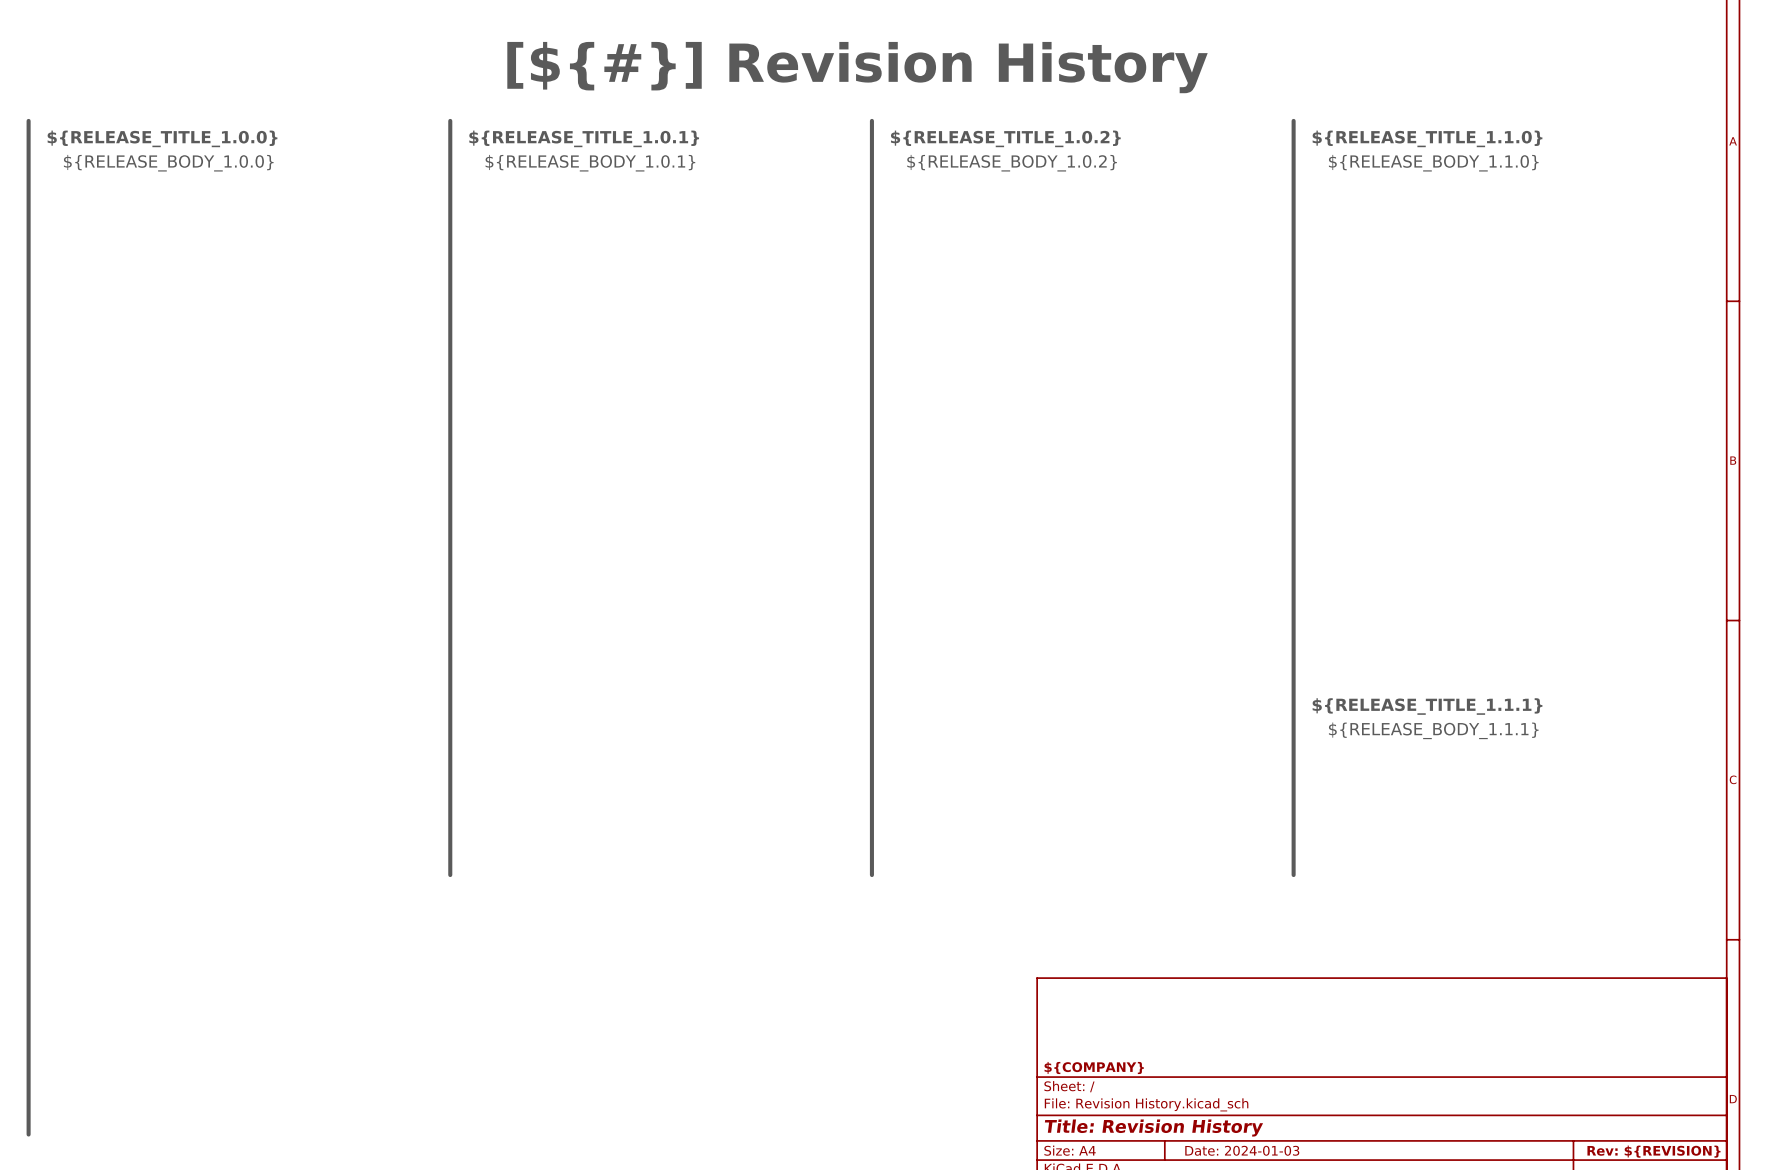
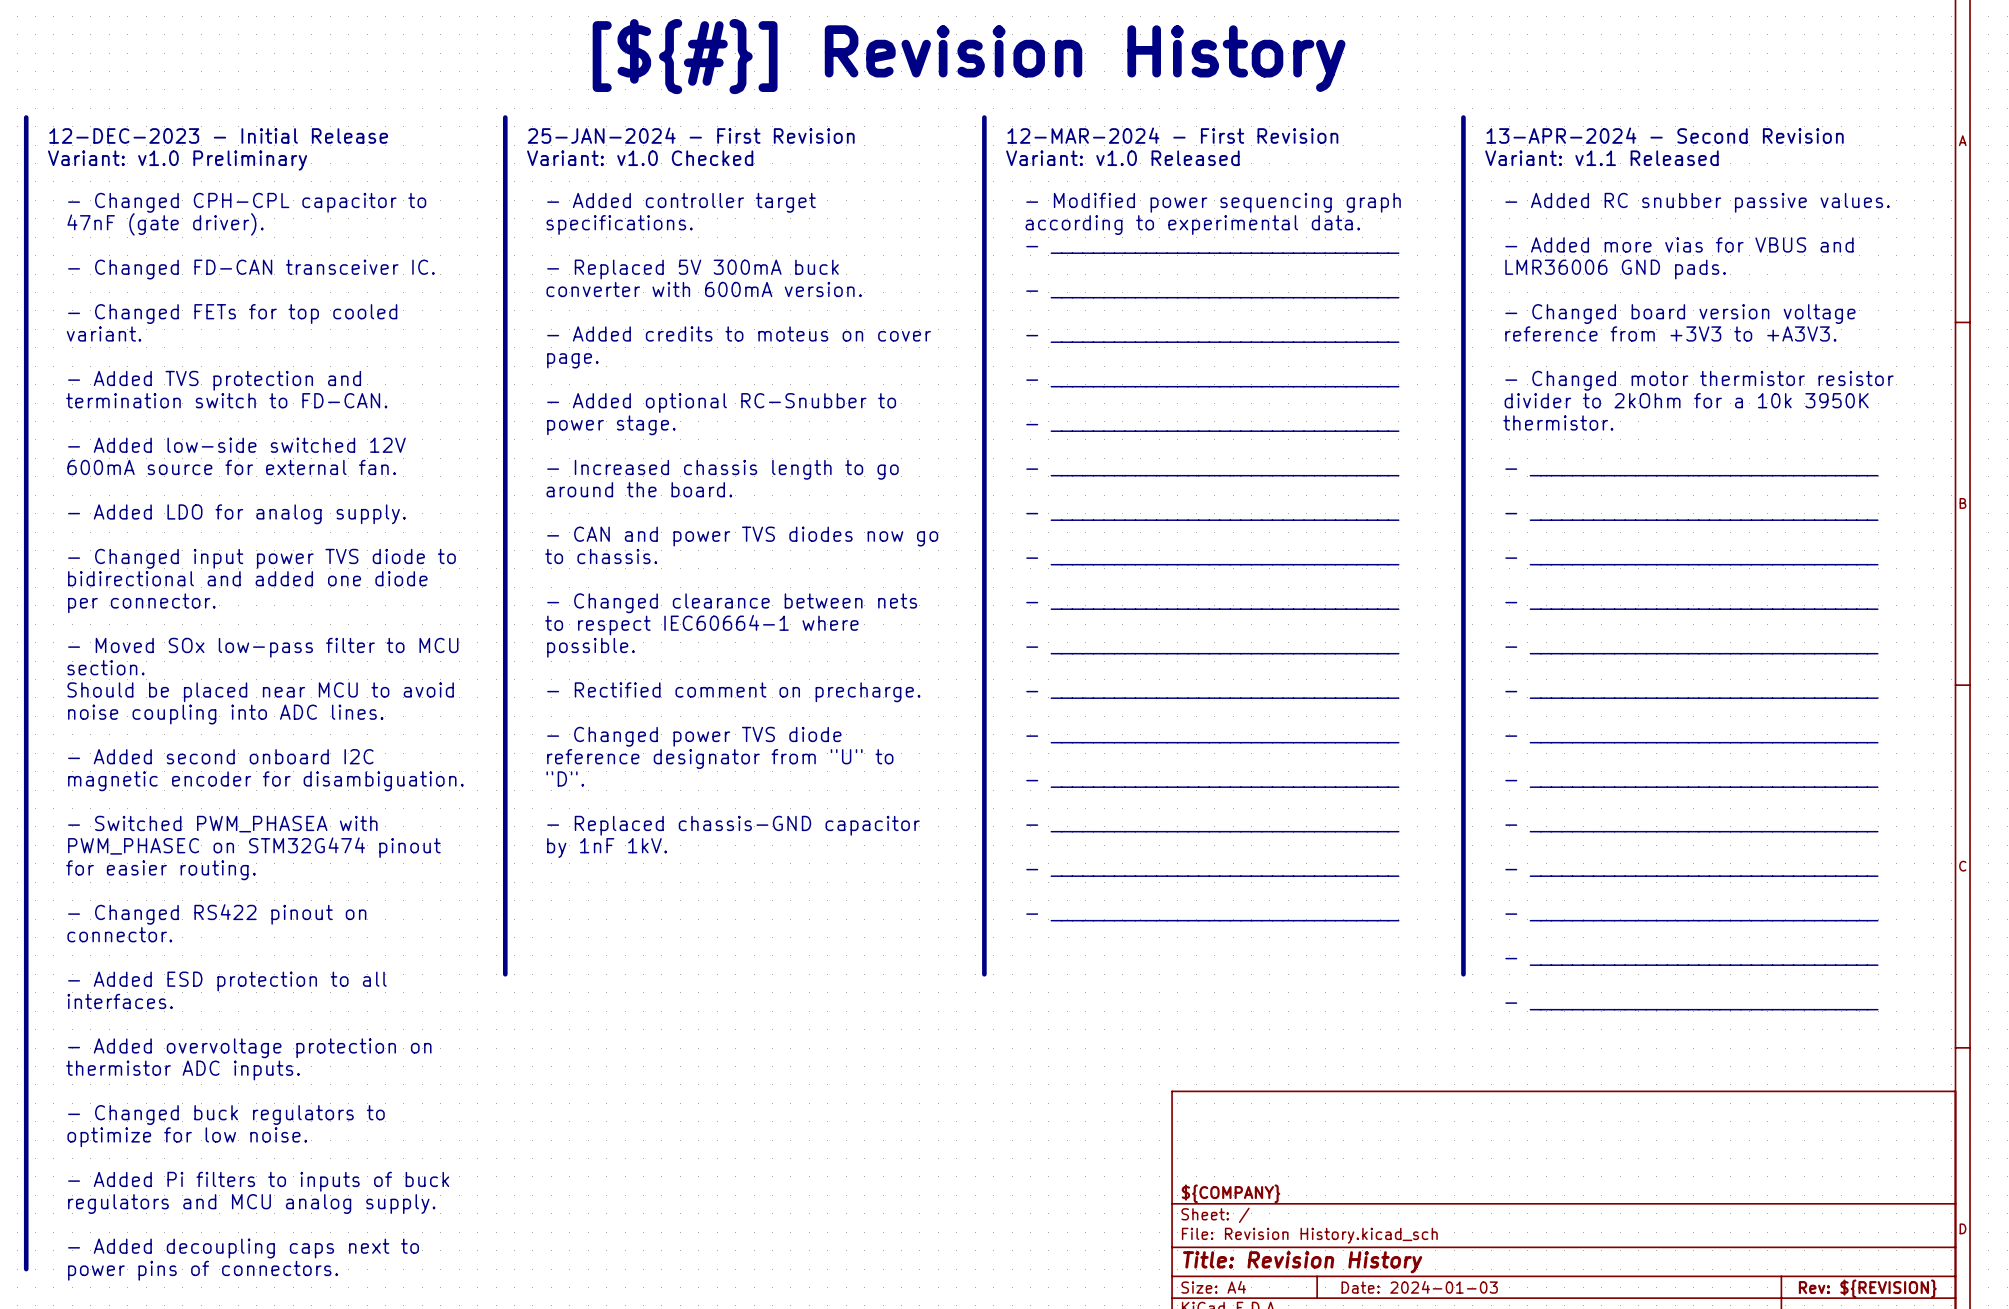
text: ${RELEASE_TITLE_1.0.0} (162, 138) -> 12-DEC-2023 - Initial Release (218, 135)
text: ${RELEASE_TITLE_1.0.1} (584, 138) -> 25-JAN-2024 - First Revision (691, 135)
text: ${RELEASE_TITLE_1.0.2} (1005, 138) -> 12-MAR-2024 - First Revision (1172, 135)
text: ${RELEASE_TITLE_1.1.0} (1427, 138) -> 13-APR-2024 - Second Revision (1665, 135)
text: none -> Variant: v1.0 Checked (640, 158)
text: none -> Variant: v1.0 Released (1122, 158)
text: none -> Variant: v1.1 Released (1601, 158)
text: none -> Variant: v1.0 Preliminary (177, 160)
text: ${RELEASE_BODY_1.0.0} (168, 163) -> none
text: ${RELEASE_BODY_1.0.1} (590, 163) -> none
text: ${RELEASE_BODY_1.0.2} (1012, 163) -> none
text: ${RELEASE_BODY_1.1.0} (1433, 163) -> none
text: none -> - Changed CPH-CPL capacitor to (247, 202)
text: none -> - Added controller target (681, 202)
text: none -> - Modified power sequencing graph (1213, 202)
text: none -> - Added RC snubber passive values. (1697, 202)
text: none -> 47nF (gate driver). (165, 224)
text: none -> specifications. (619, 225)
text: none -> according to experimental data. (1192, 225)
text: none -> - Added more vias for VBUS and (1679, 244)
text: none -> - _________________________________ (1212, 249)
text: none -> - Changed FD-CAN transceiver IC. (251, 269)
text: none -> - Replaced 5V 300mA buck (692, 269)
text: none -> LMR36006 GND pads. (1615, 269)
text: none -> converter with 600mA version. (704, 289)
text: none -> - _________________________________ (1212, 294)
text: none -> - Changed FETs for top cooled (232, 314)
text: none -> - Changed board version voltage (1680, 314)
text: none -> variant. (104, 333)
text: none -> - Added credits to moteus on cover (739, 333)
text: none -> reference from +3V3 to +A3V3. (1670, 333)
text: none -> - _________________________________ (1212, 338)
text: none -> page. (572, 360)
text: none -> - Added TVS protection and (214, 380)
text: none -> - Changed motor thermistor resistor (1699, 380)
text: none -> - _________________________________ (1212, 383)
text: none -> termination switch to FD-CAN. (226, 400)
text: none -> divider to 2kOhm for a 10k 3950K (1686, 400)
text: none -> - Added optional RC-Snubber to (721, 403)
text: none -> thermistor. (1558, 422)
text: none -> power stage. (611, 425)
text: none -> - _________________________________ (1212, 427)
text: none -> - Added low-side switched 12V (236, 445)
text: none -> 600mA source for external fan. (231, 467)
text: none -> - Increased chassis length to go (722, 469)
text: none -> - _________________________________ (1212, 472)
text: none -> - _________________________________ (1691, 472)
text: none -> around the board. (639, 489)
text: none -> - Added LDO for analog supply. (236, 514)
text: none -> - _________________________________ (1212, 516)
text: none -> - _________________________________ (1691, 516)
text: none -> - CAN and power TVS diodes now go (742, 536)
text: none -> to chassis. (601, 556)
text: none -> - Changed input power TVS diode to (261, 558)
text: none -> - _________________________________ (1212, 561)
text: none -> - _________________________________ (1691, 561)
text: none -> bidirectional and added one diode (247, 578)
text: none -> - Changed clearance between nets (732, 603)
text: none -> per connector. (141, 603)
text: none -> - _________________________________ (1212, 605)
text: none -> - _________________________________ (1691, 605)
text: none -> to respect IEC60664-1 where (701, 625)
text: none -> - Moved SOx low-pass filter to MCU (263, 647)
text: none -> possible. (590, 647)
text: none -> - _________________________________ (1212, 650)
text: none -> - _________________________________ (1691, 650)
text: none -> section. (105, 667)
text: none -> Should be placed near MCU to avoid (260, 692)
text: none -> - Rectified comment on precharge. (733, 692)
text: none -> - _________________________________ (1212, 694)
text: none -> - _________________________________ (1691, 694)
text: none -> noise coupling into ADC lines. (225, 714)
text: none -> - Changed power TVS diode (694, 736)
text: none -> - _________________________________ (1212, 739)
text: none -> - _________________________________ (1691, 739)
text: none -> - Added second onboard I2C (220, 756)
text: none -> reference designator from "U" to (720, 759)
text: none -> "D". (565, 778)
text: none -> magnetic encoder for disambiguation. (265, 781)
text: ${RELEASE_TITLE_1.1.1} (1427, 706) -> none
text: none -> - _________________________________ (1212, 783)
text: none -> - _________________________________ (1691, 783)
text: ${RELEASE_BODY_1.1.1} (1433, 730) -> none
text: none -> - Switched PWM_PHASEA with (222, 824)
text: none -> - Replaced chassis-GND capacitor (733, 825)
text: none -> - _________________________________ (1212, 828)
text: none -> - _________________________________ (1691, 828)
text: none -> PWM_PHASEC on STM32G474 pinout (254, 847)
text: none -> by 1nF 1kV. (607, 848)
text: none -> for easier routing. (160, 870)
text: none -> - _________________________________ (1212, 872)
text: none -> - _________________________________ (1691, 872)
text: none -> - Changed RS422 pinout on (217, 914)
text: none -> - _________________________________ (1212, 917)
text: none -> - _________________________________ (1691, 917)
text: none -> connector. (119, 934)
text: none -> - _________________________________ (1691, 961)
text: none -> - Added ESD protection to all (227, 981)
text: none -> interfaces. (120, 1001)
text: none -> - _________________________________ (1691, 1006)
text: none -> - Added overvoltage protection on (249, 1048)
text: none -> thermistor ADC inputs. (182, 1070)
text: none -> - Changed buck regulators to (226, 1114)
text: none -> optimize for low noise. (187, 1137)
text: none -> - Added Pi filters to inputs of buck (258, 1181)
text: none -> regulators and MCU analog supply. (251, 1203)
text: none -> - Added decoupling caps next to (243, 1248)
text: none -> power pins of connectors. (203, 1270)

